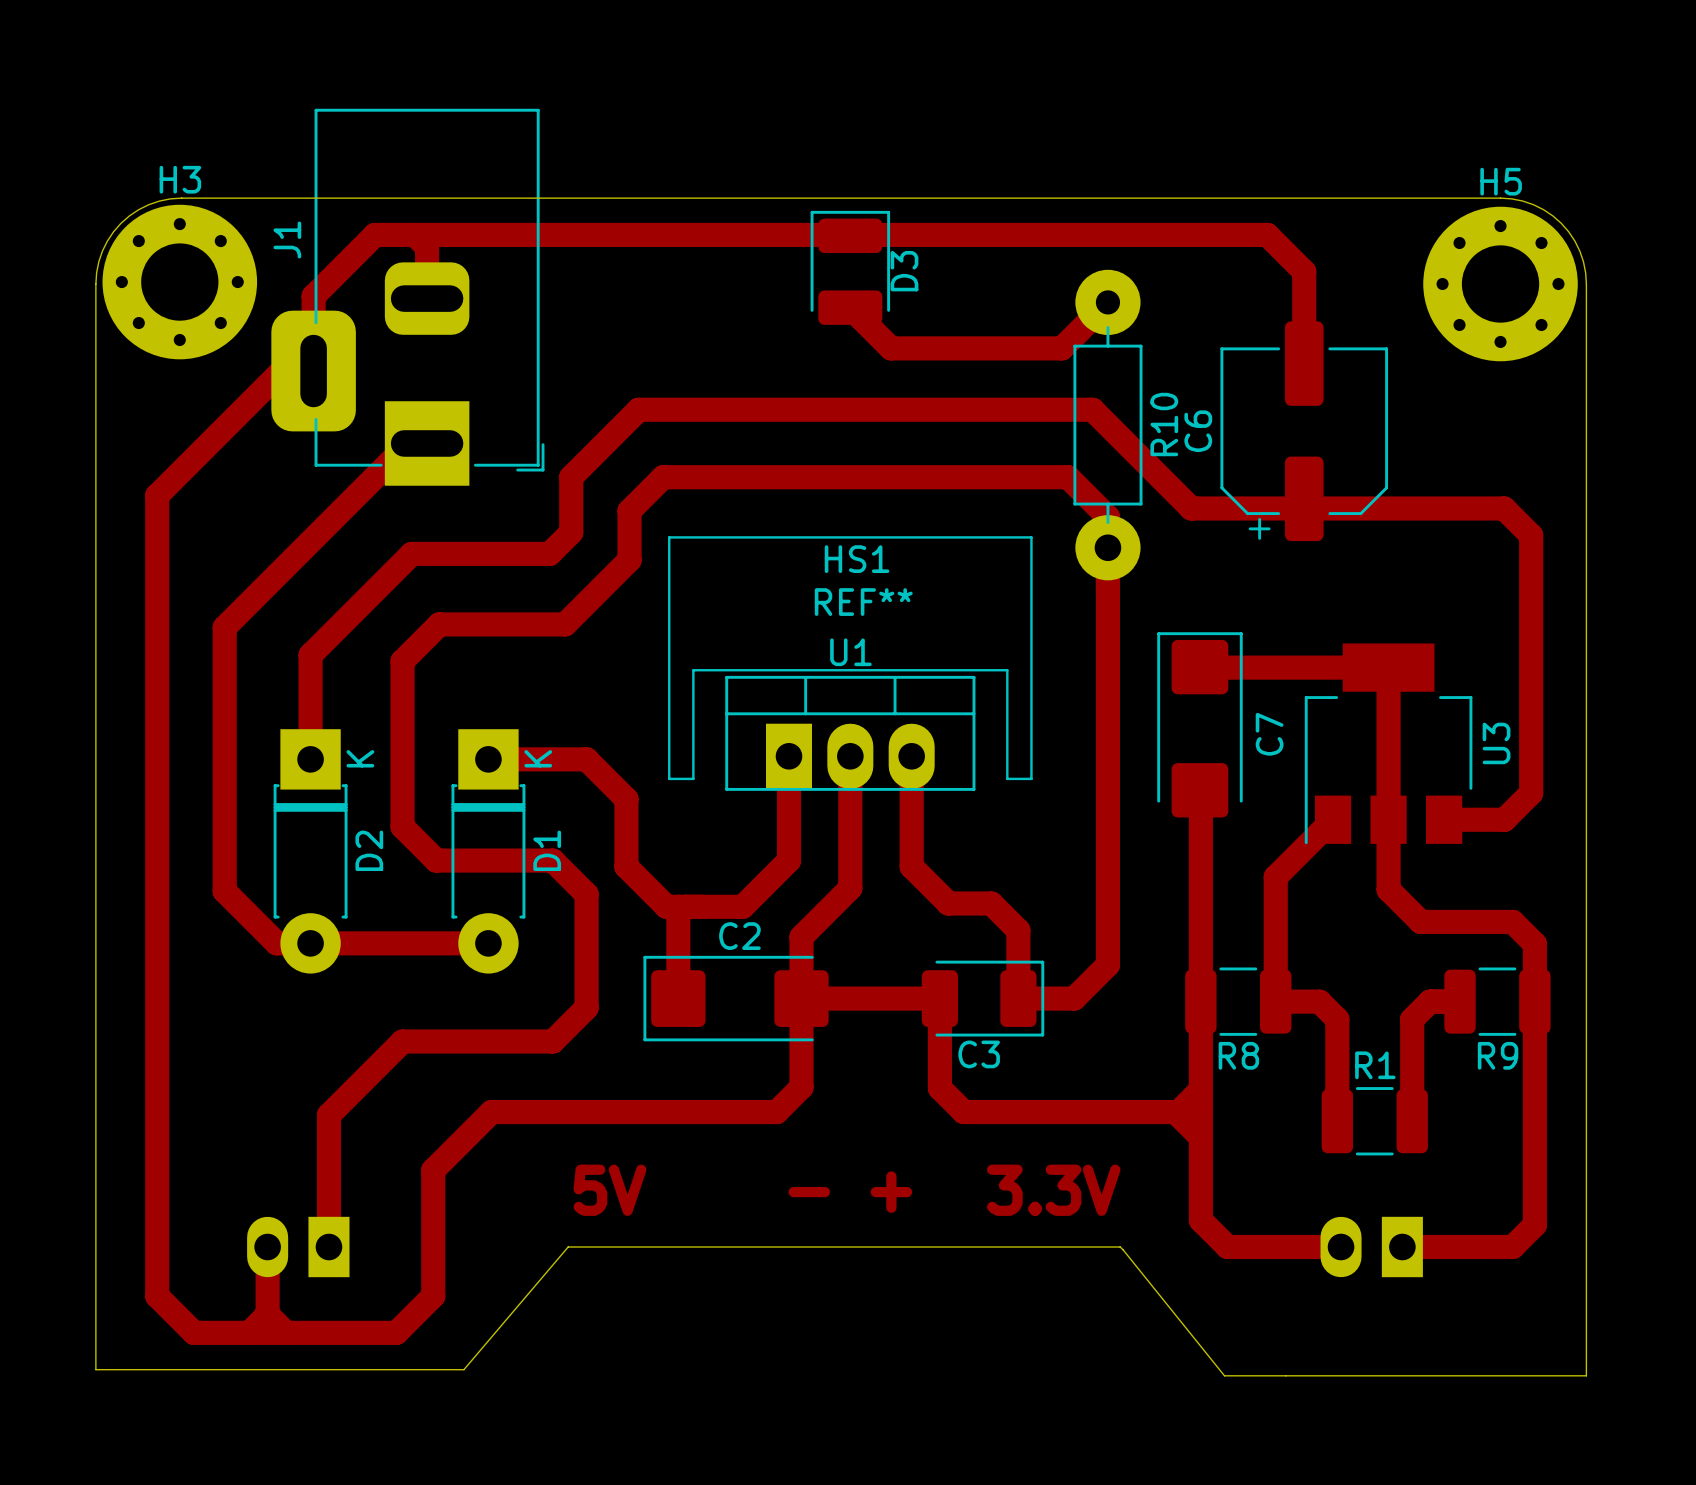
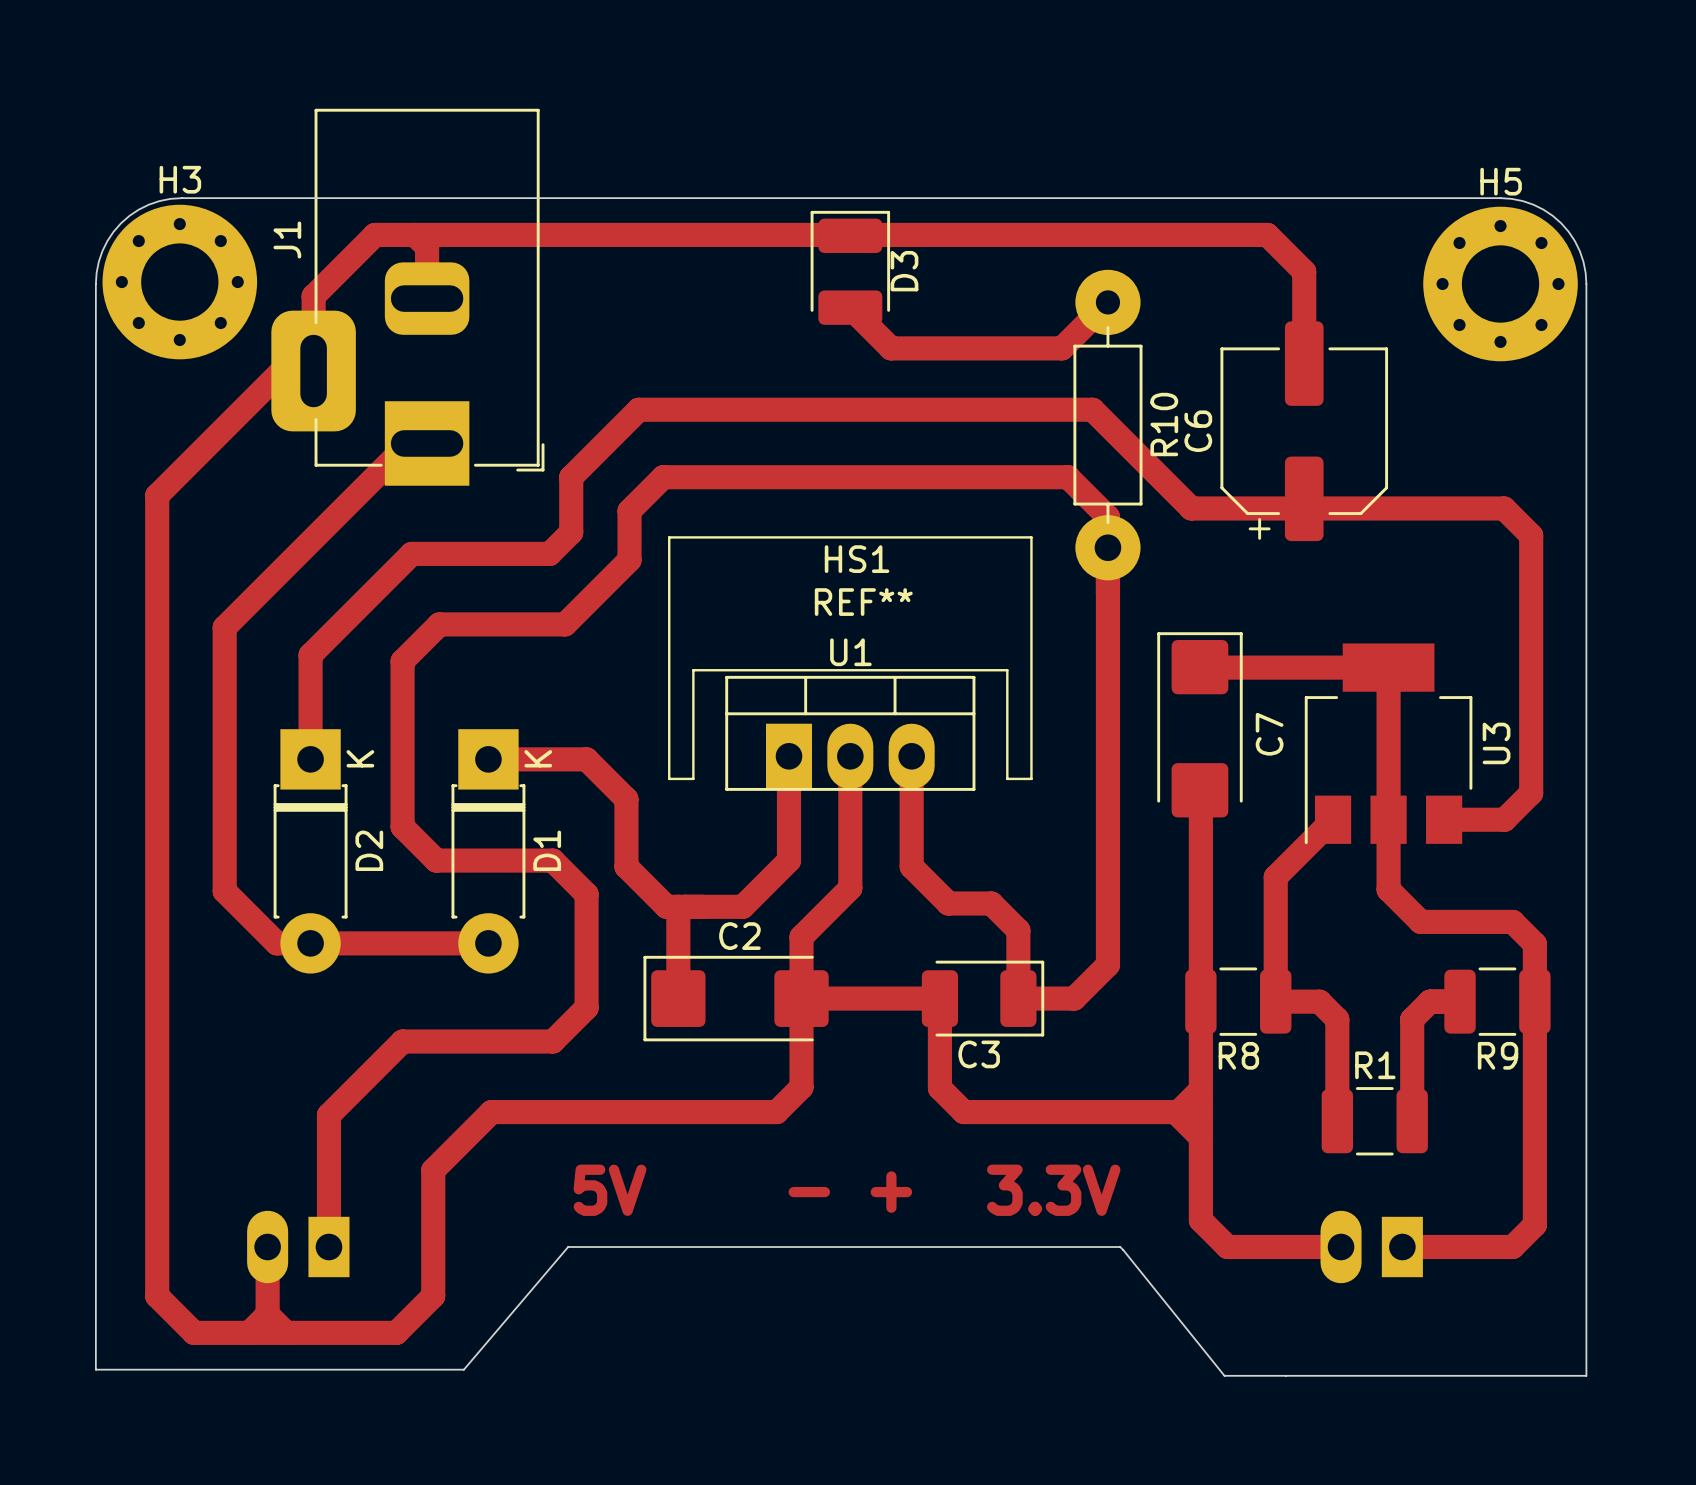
part footprint: [247, 1216, 350, 1278] -> [247, 1210, 350, 1284]
part footprint: [1320, 1216, 1423, 1278] -> [1320, 1210, 1423, 1284]

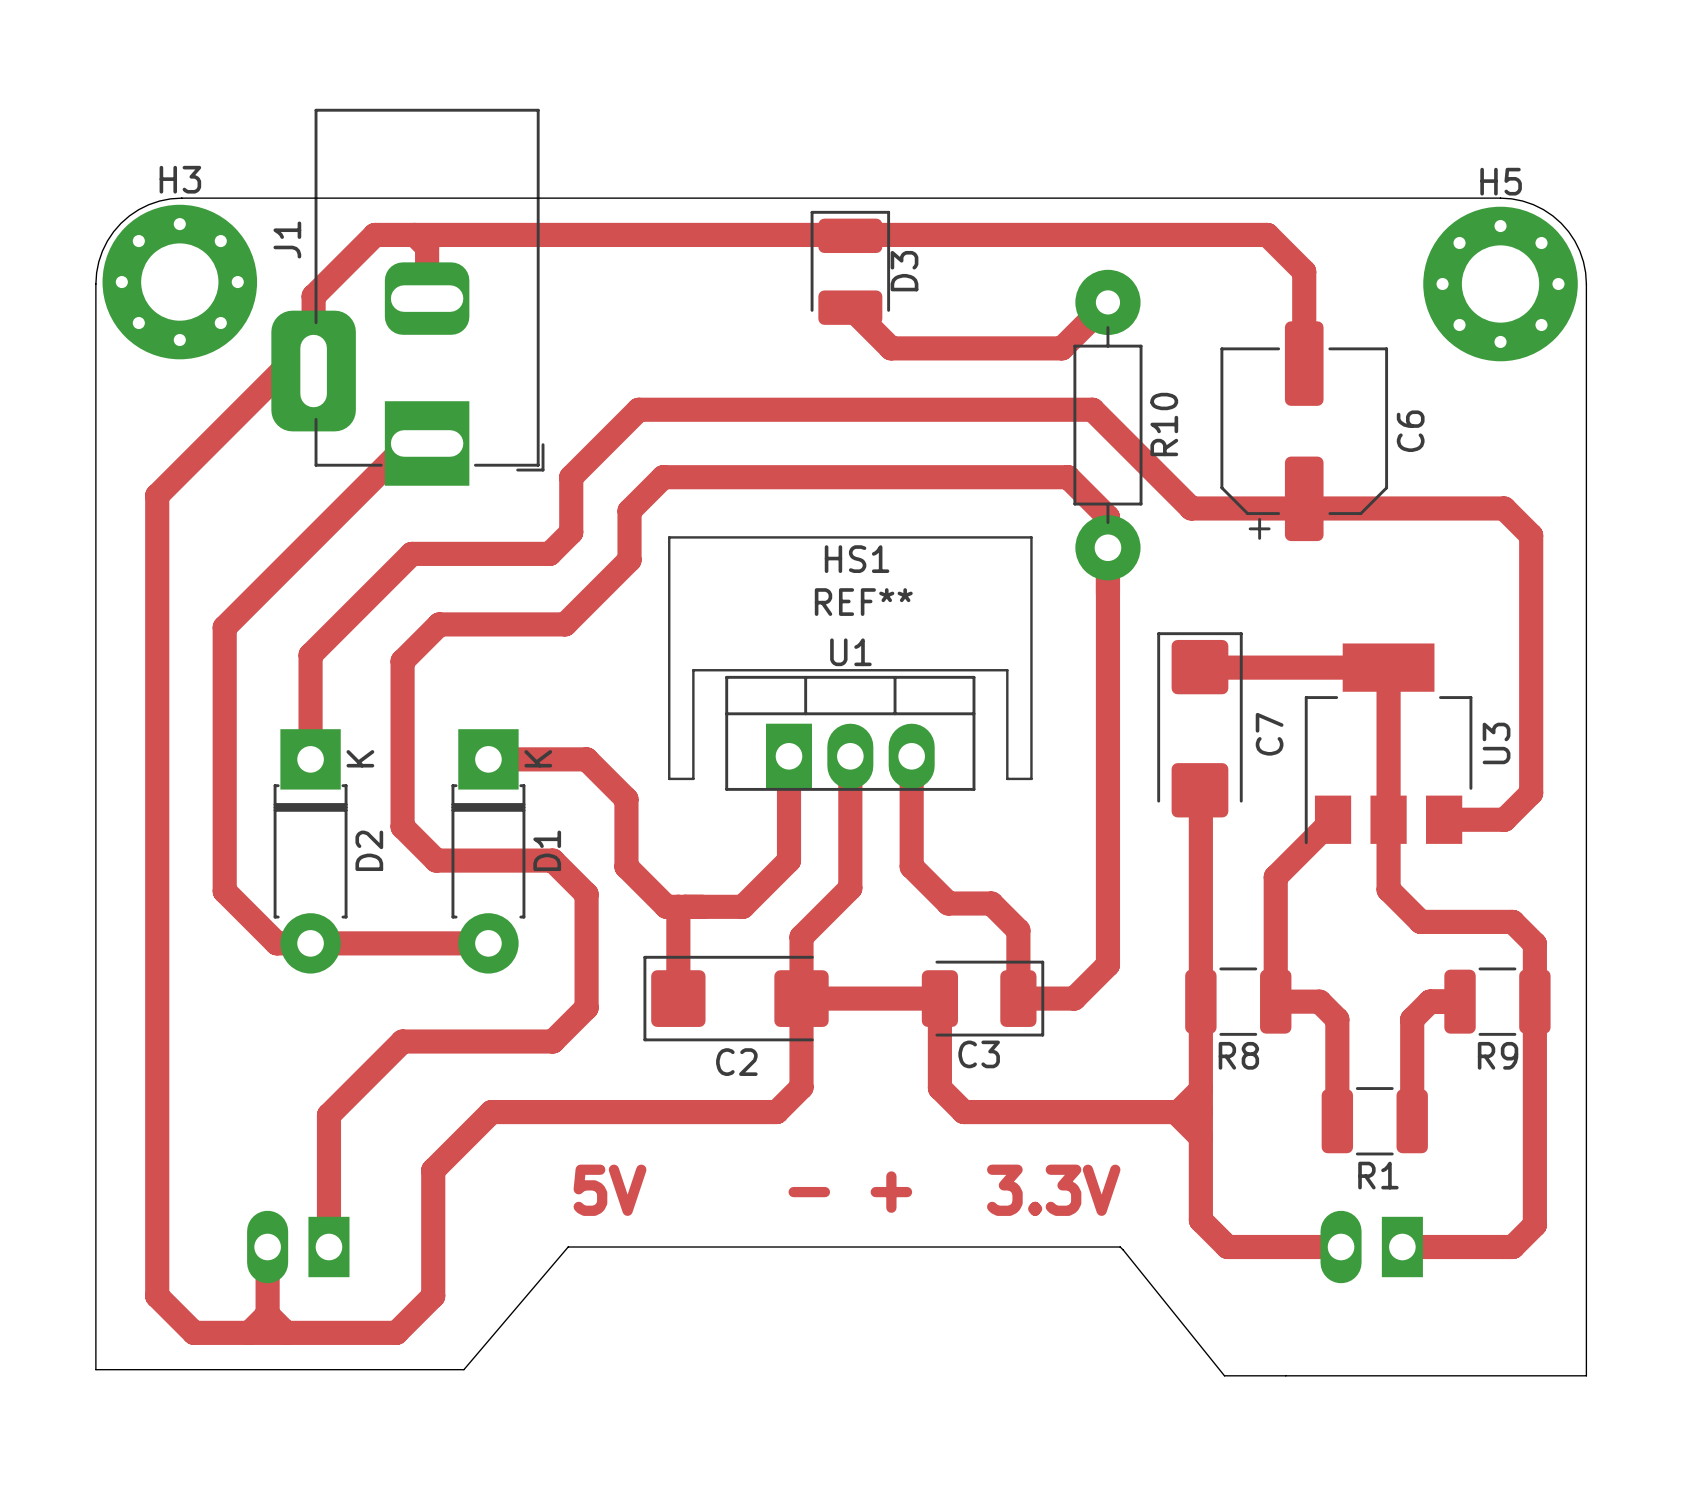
C6 name position: C6 (1198, 431) -> C6 (1410, 431)
C2 name position: C2 (739, 936) -> C2 (736, 1062)
R1 name position: R1 (1375, 1065) -> R1 (1378, 1175)

